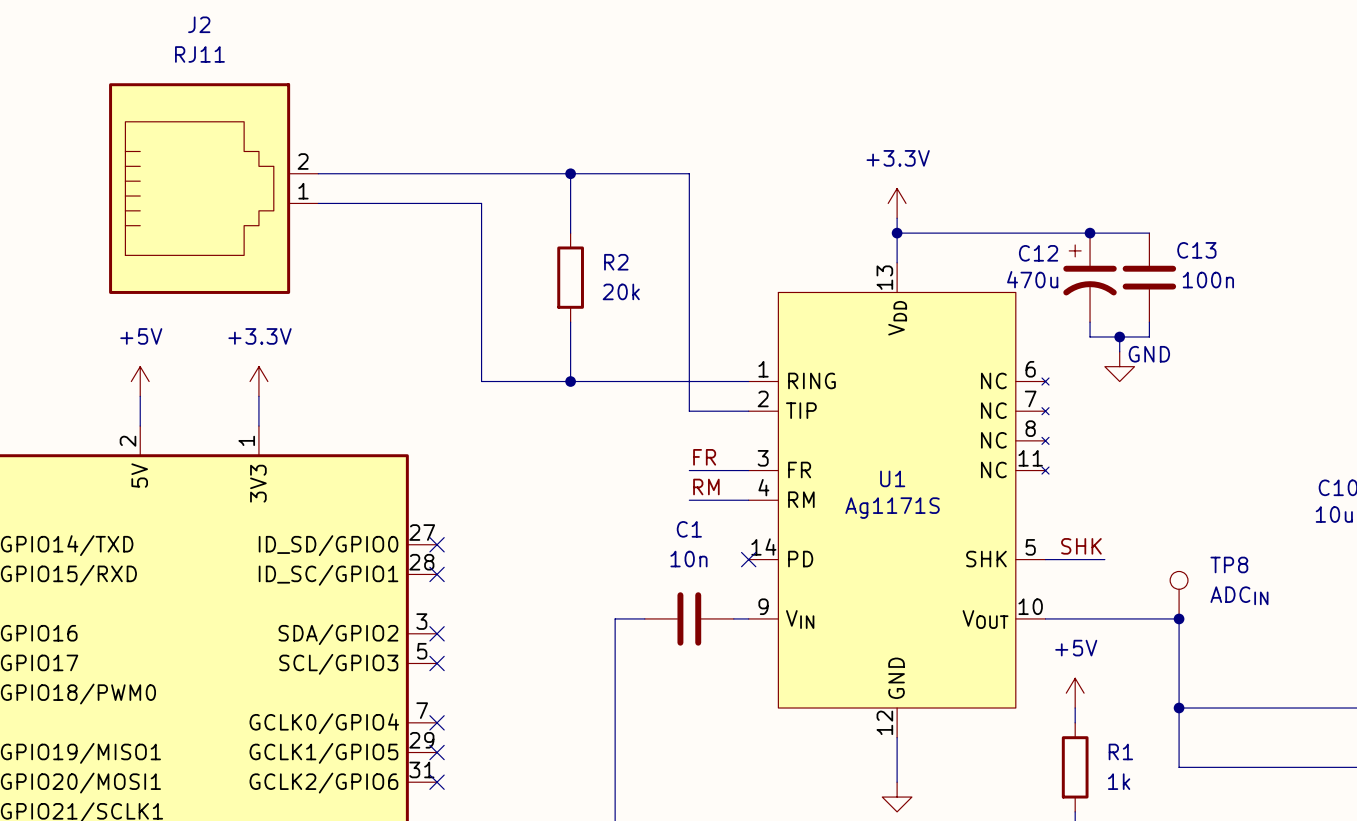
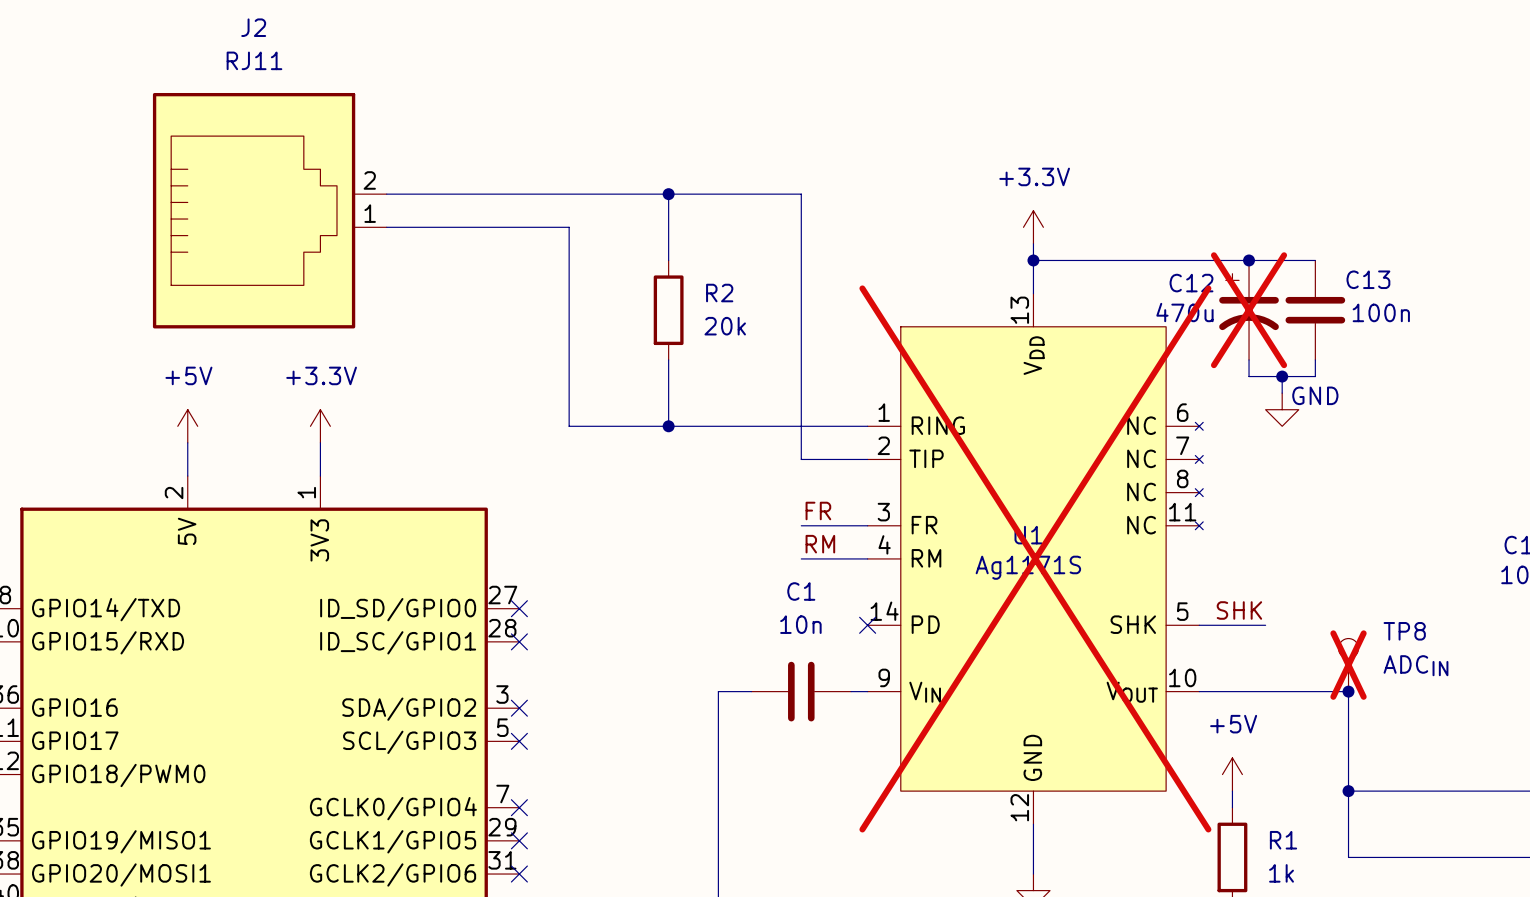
C12 do-not-place cross: none -> (1249, 310)
U1 do-not-place cross: none -> (1035, 558)
TP8 do-not-place cross: none -> (1348, 665)

